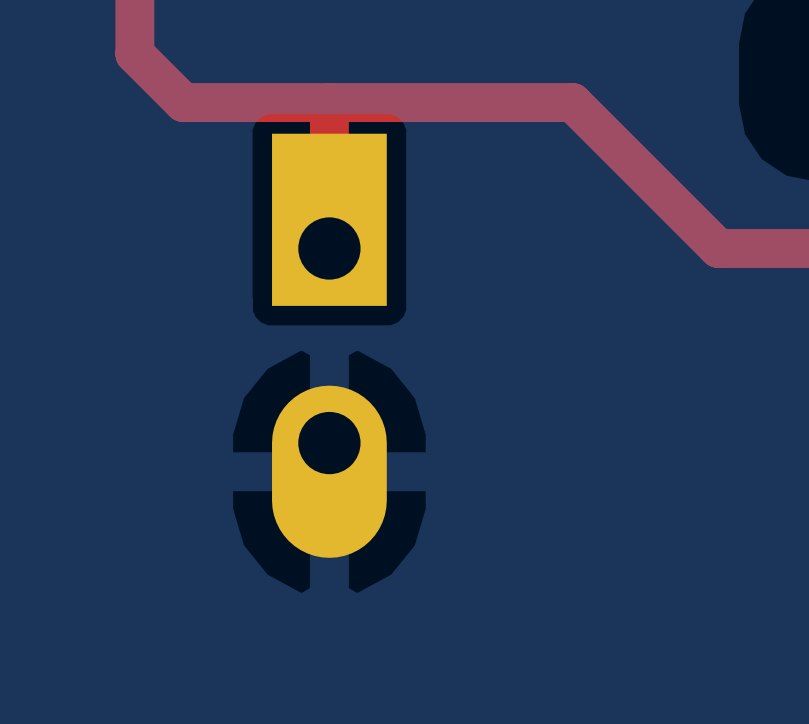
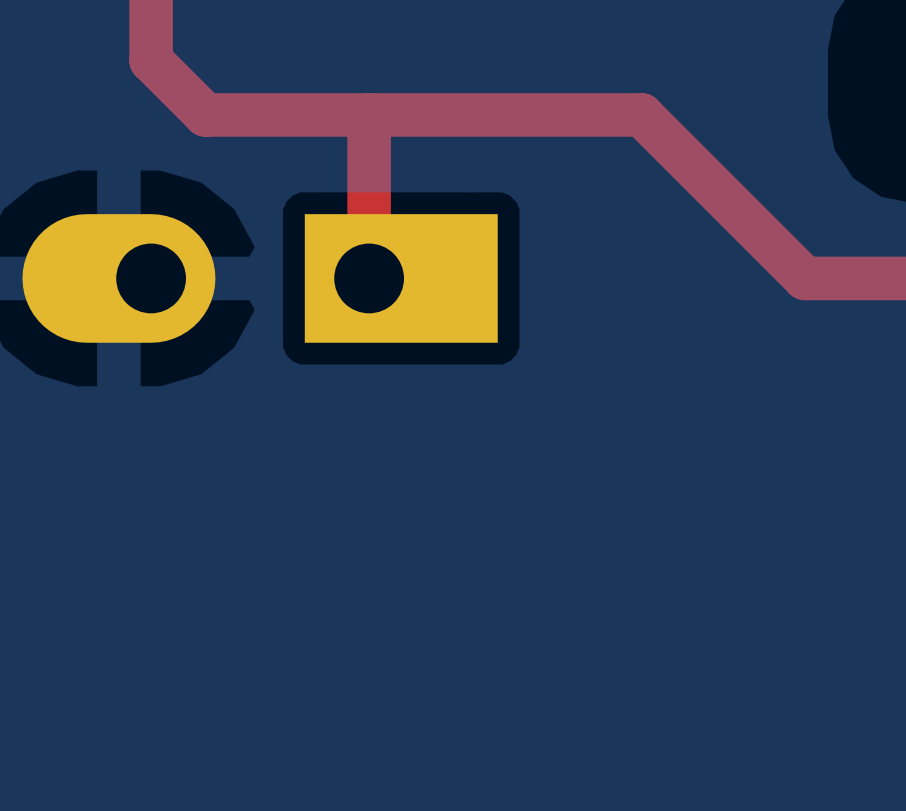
part rotation: 0° (329, 345) -> 90° clockwise (260, 278)

